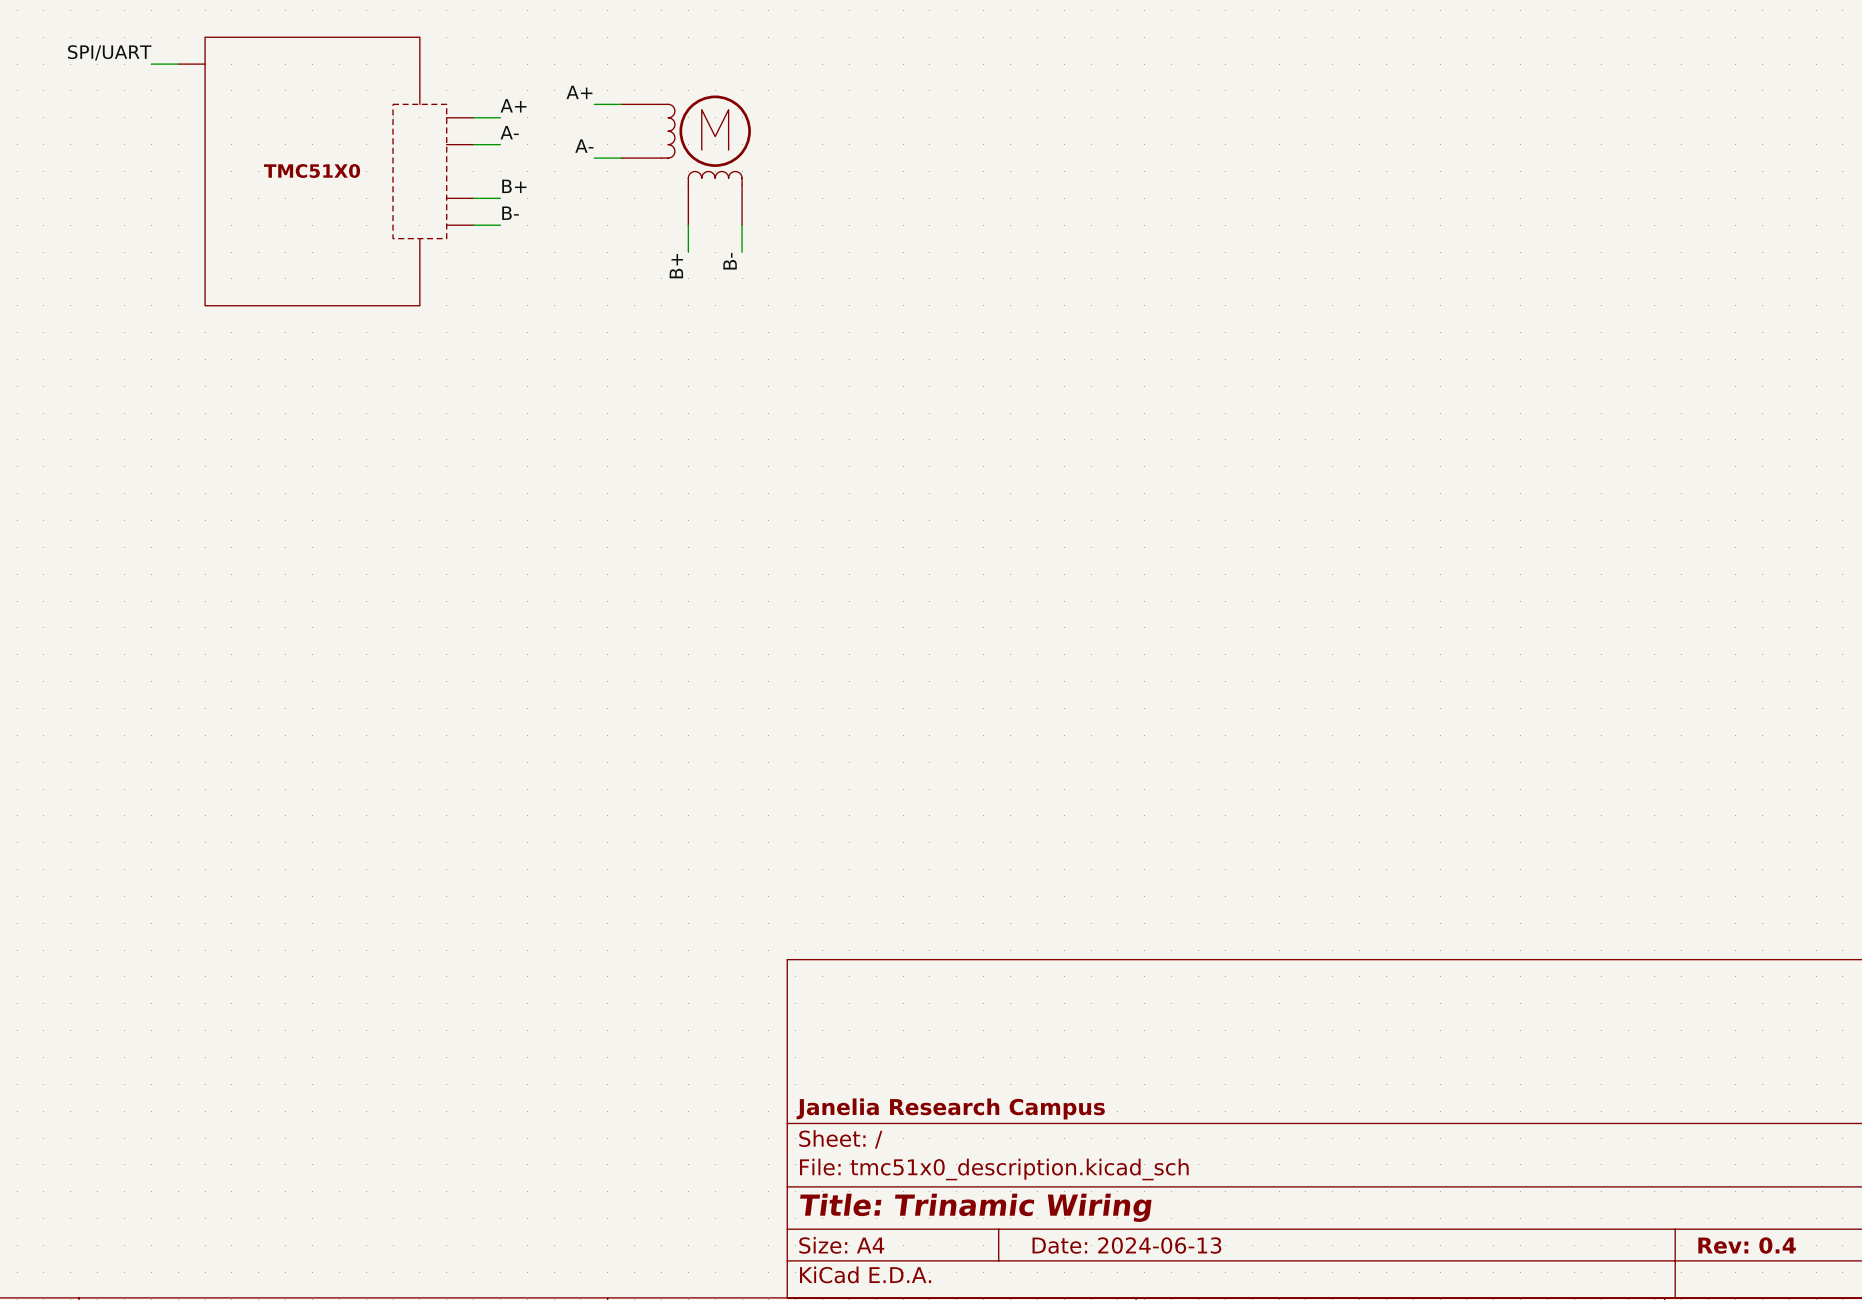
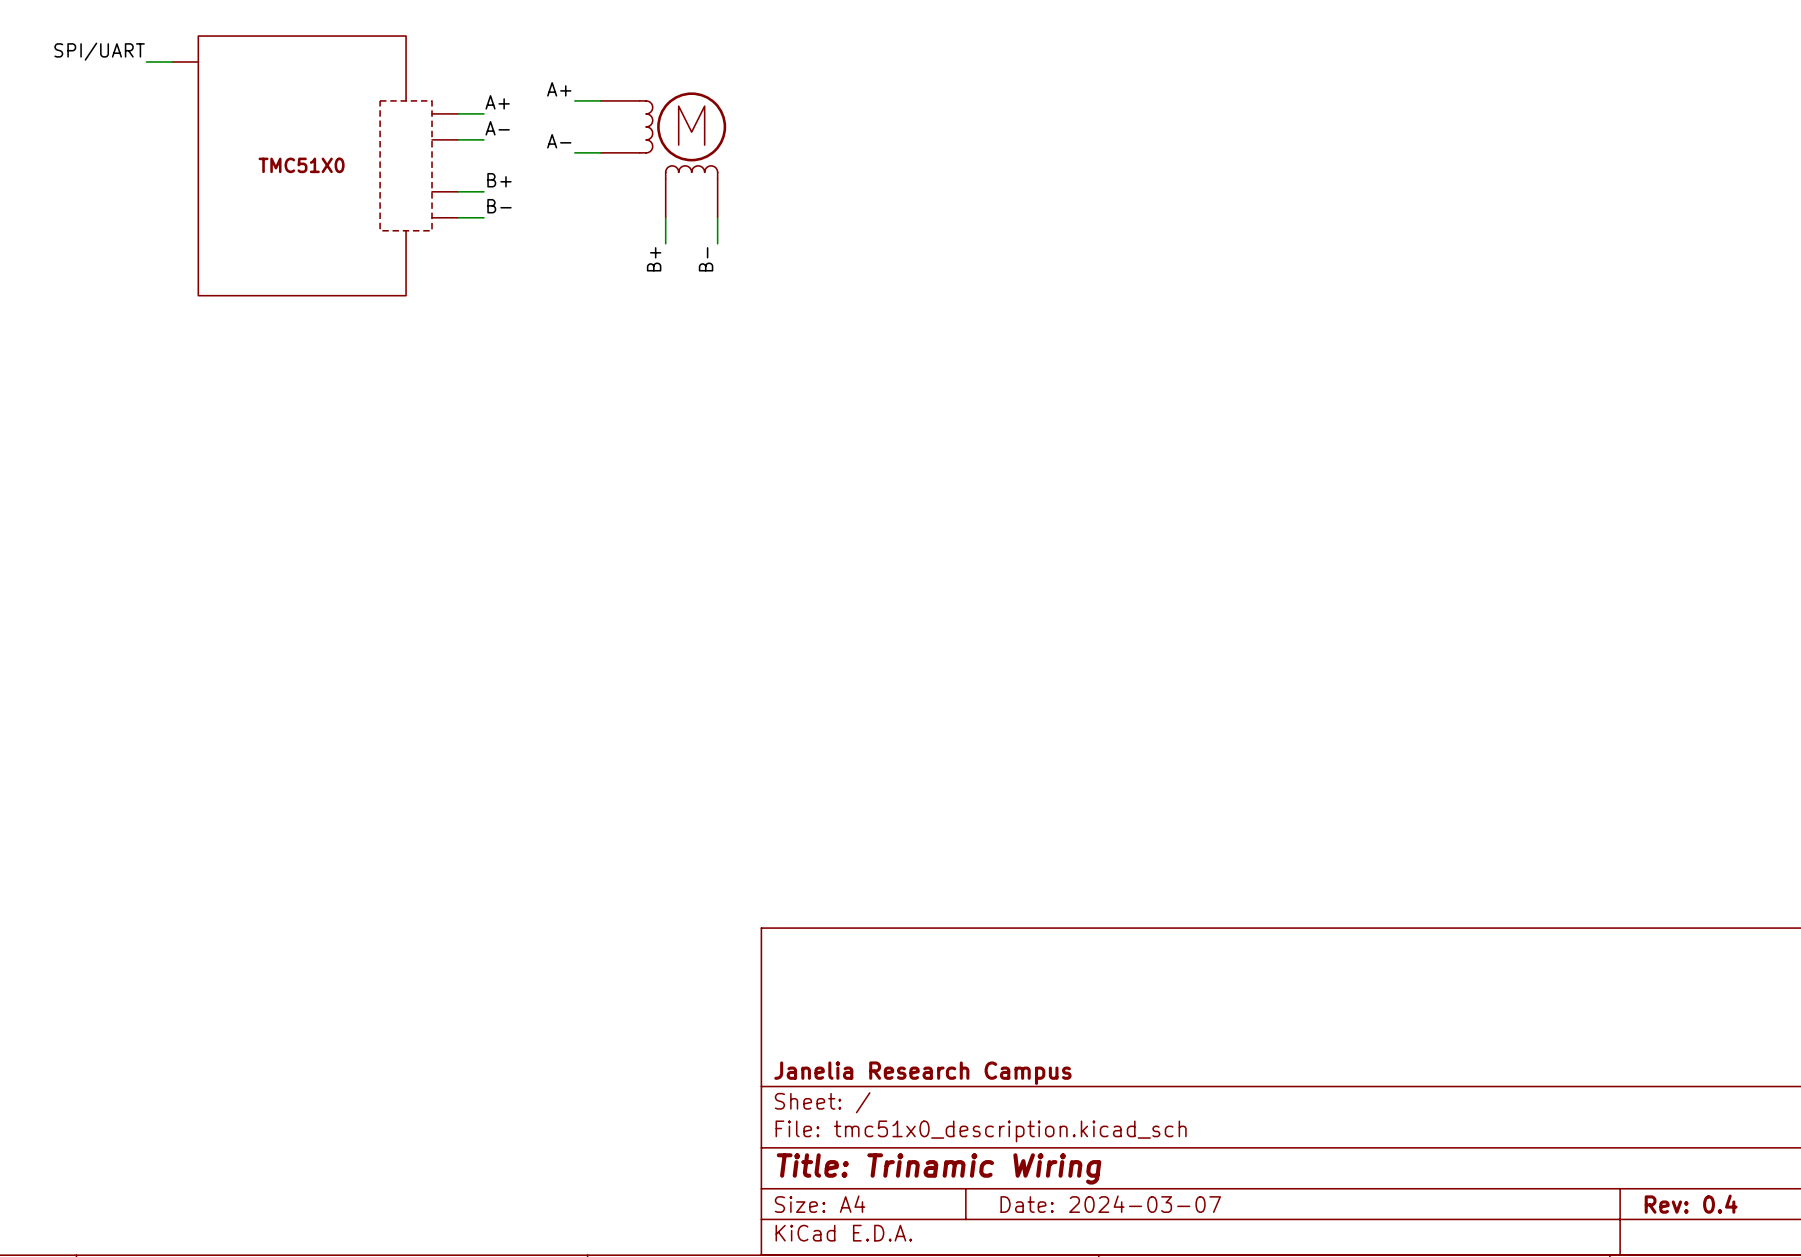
title block: Date: 2024-06-13 (1126, 1245) -> Date: 2024-03-07 (1110, 1204)

